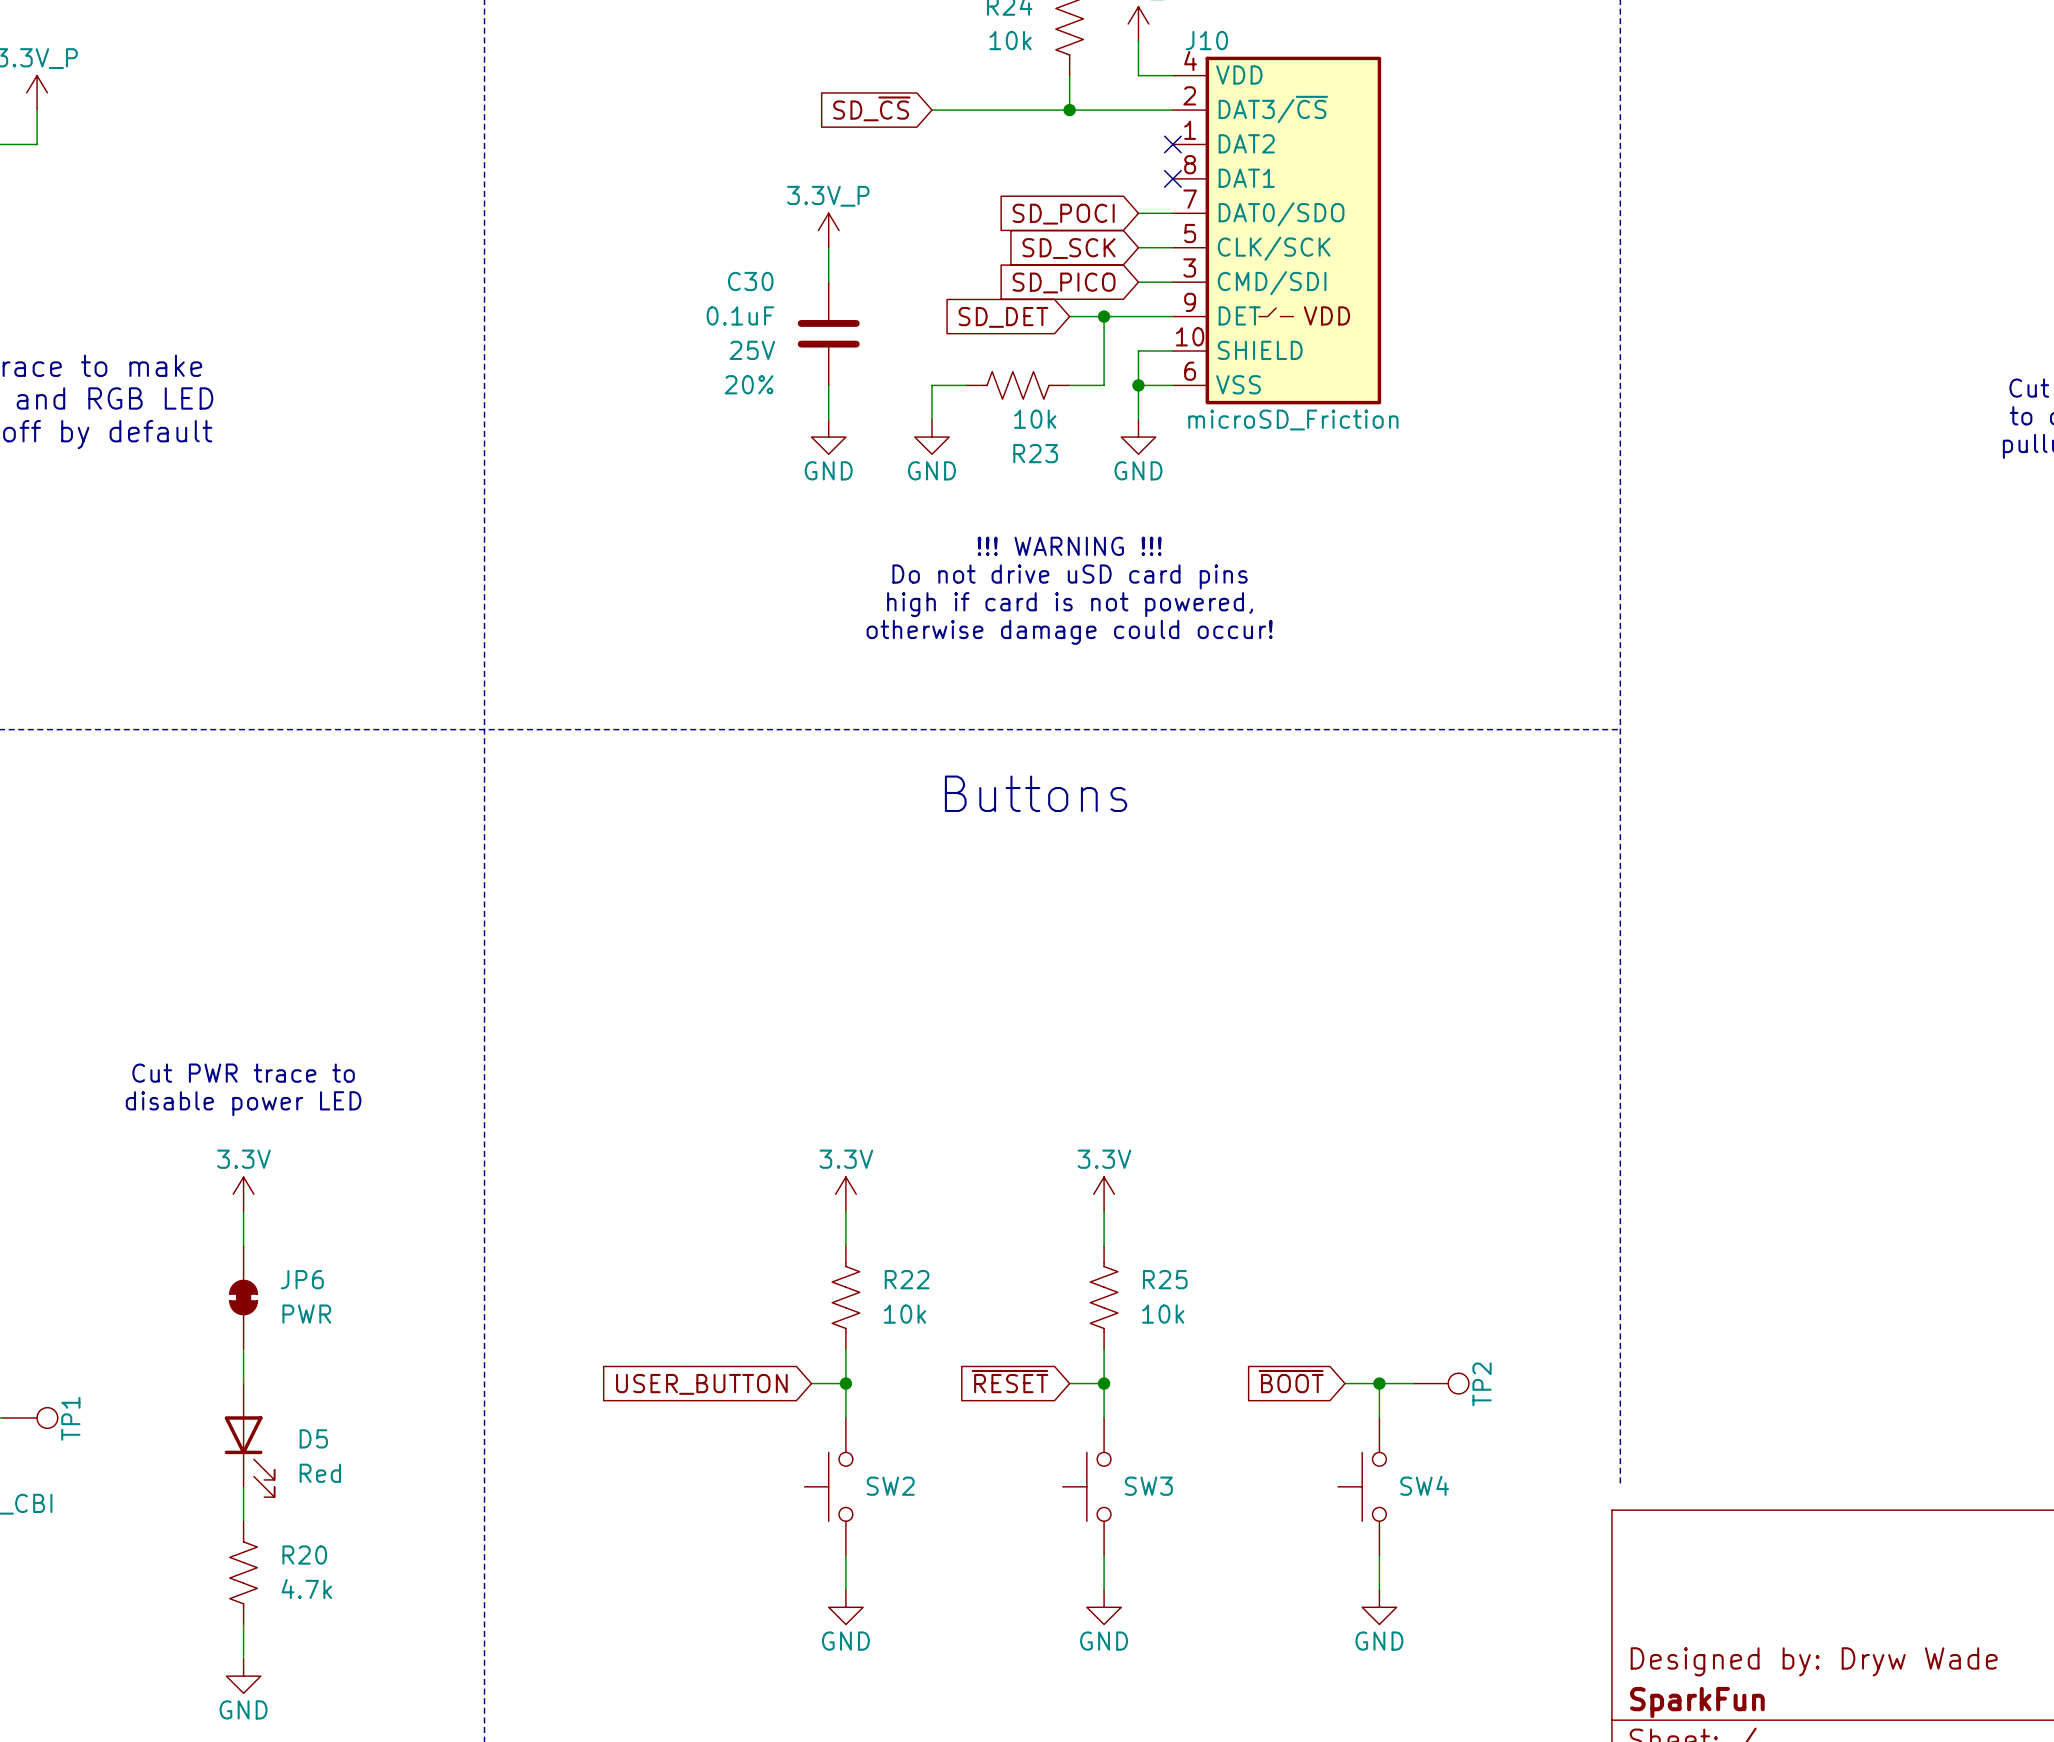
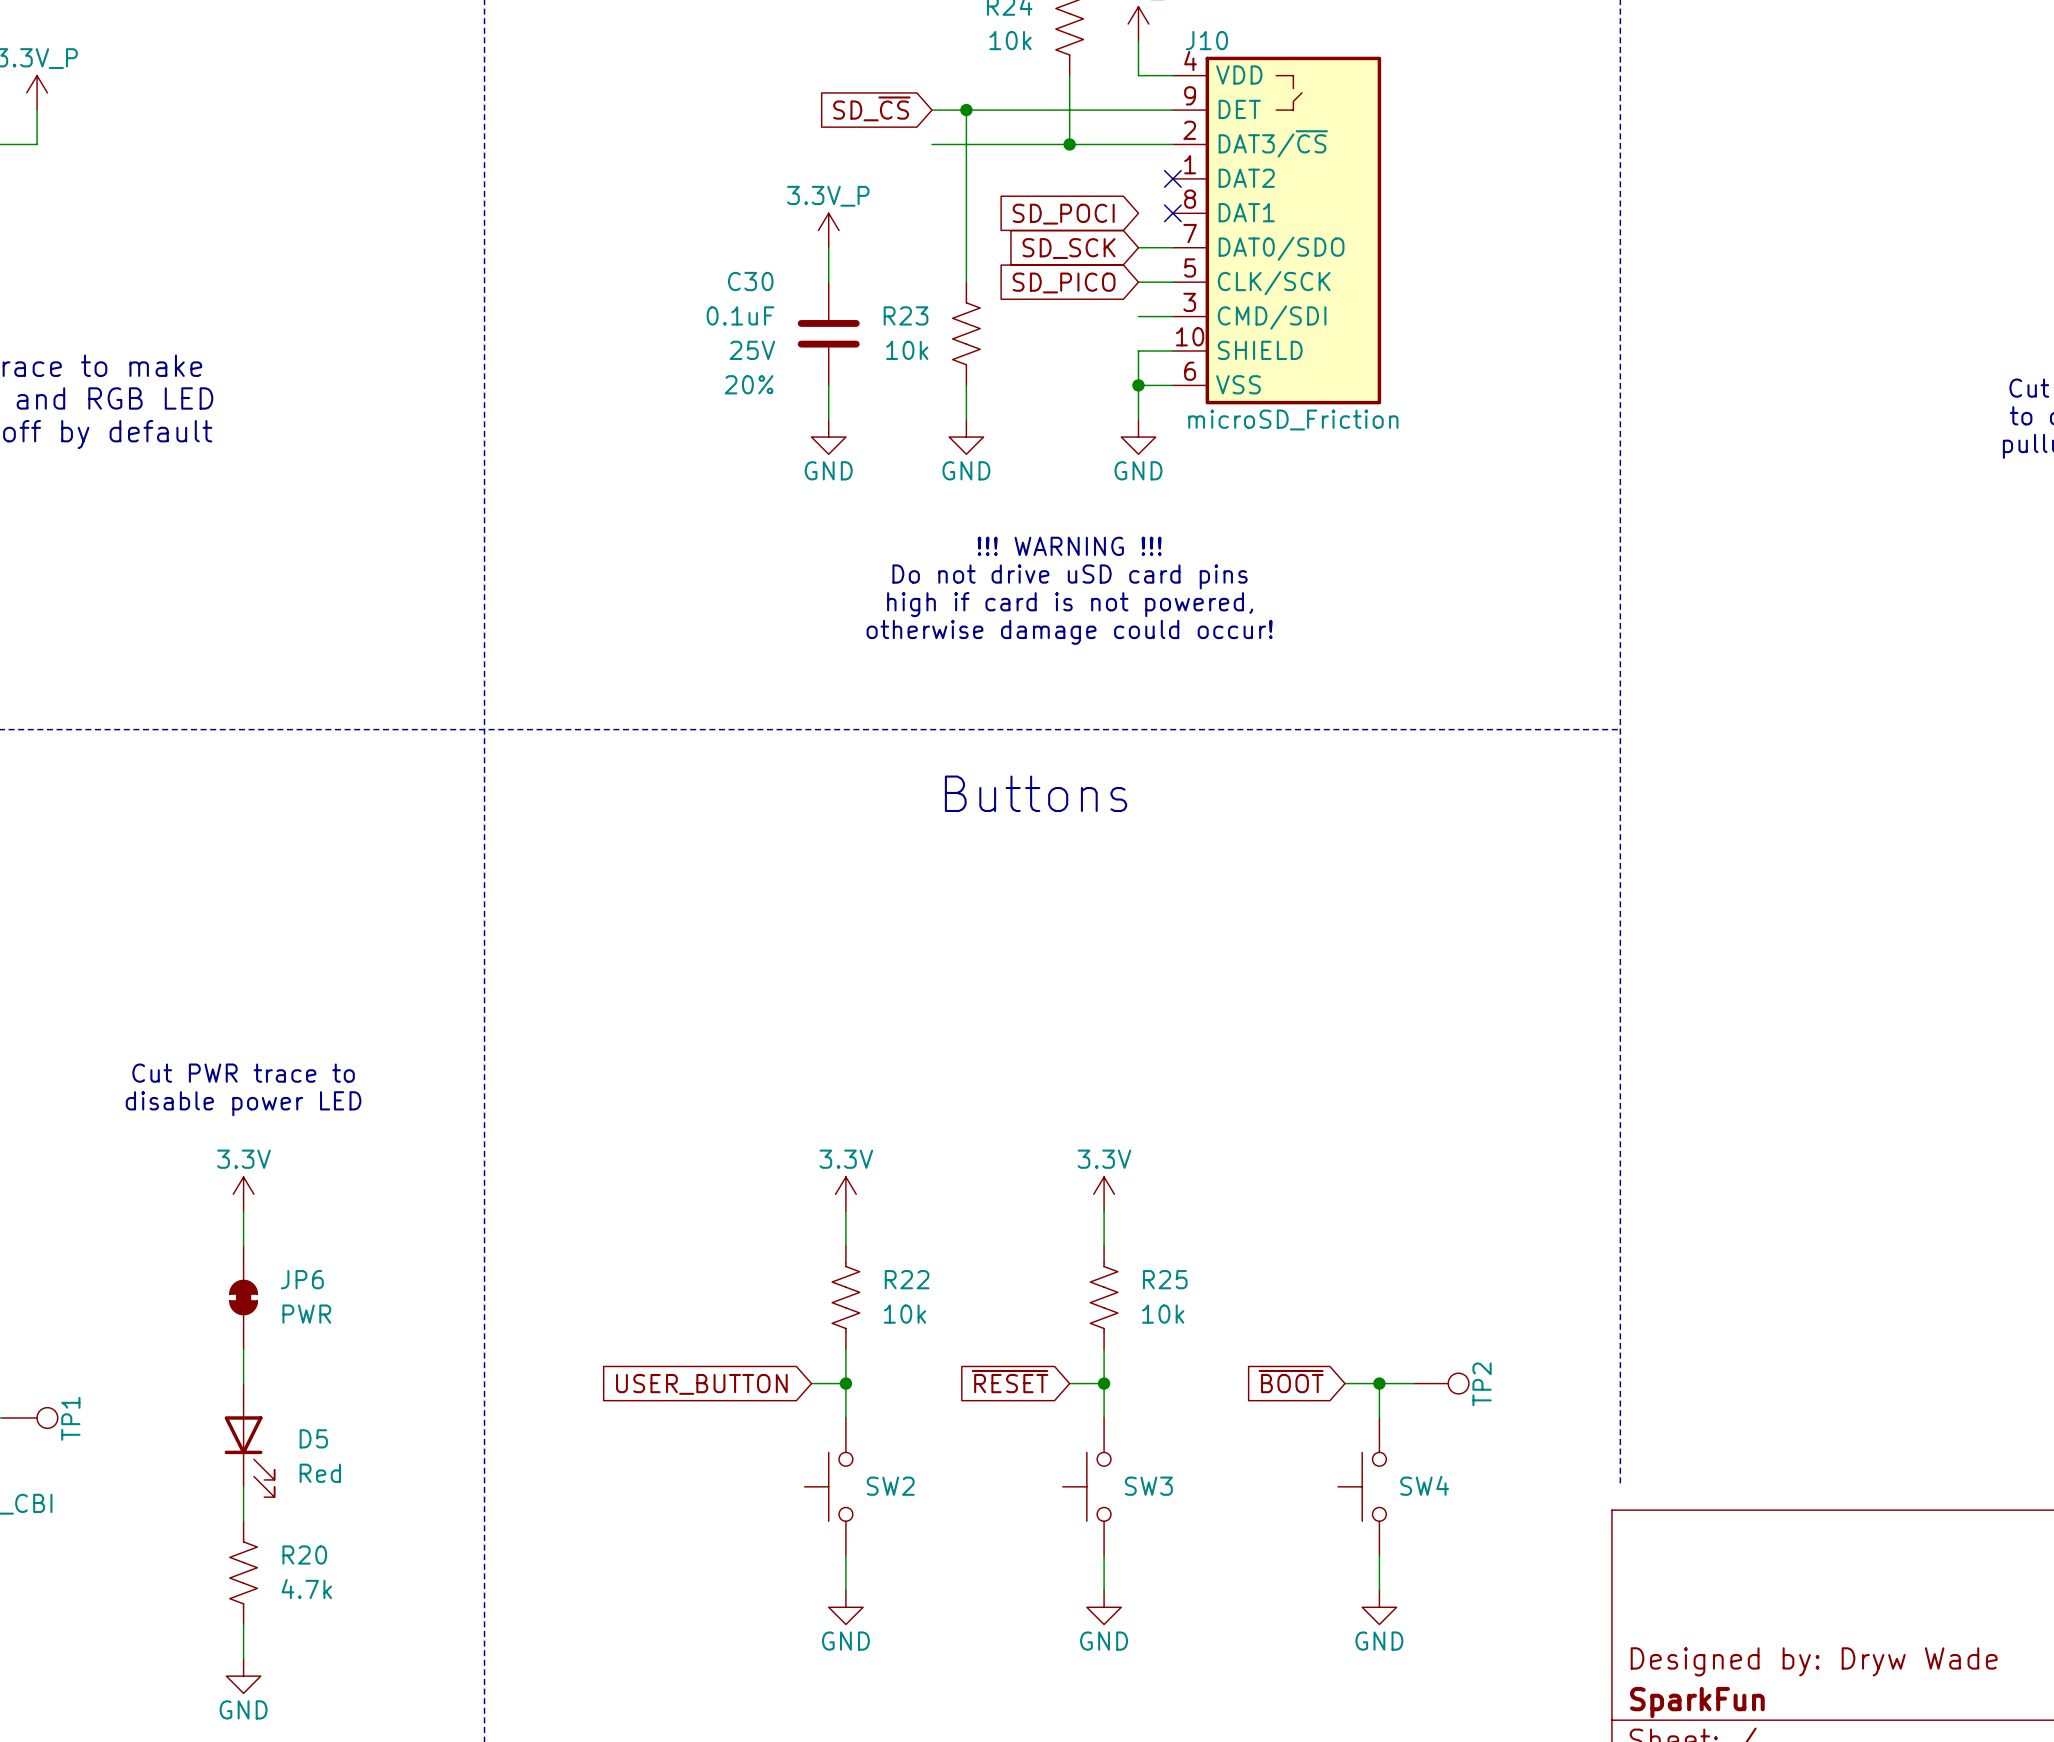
J10 symbol: [1172, 56, 1382, 405] -> [1172, 56, 1382, 405]
wire: none -> (966, 110) (966, 282)
junction: none -> (966, 110)
wire: none -> (1069, 110) (1069, 144)
junction position: (1069, 110) -> (1069, 144)
wire: none -> (931, 144) (1172, 144)
no-connect mark position: (1172, 144) -> (1172, 213)
wire: (1138, 213) (1172, 213) -> none
wire: (1069, 316) (1138, 316) -> none
wire: (1104, 316) (1104, 385) (1069, 385) -> none
junction: (1104, 316) -> none
global label: SD_DET (1003, 317) -> none
wire: (966, 385) (931, 385) (931, 419) -> (966, 385) (966, 419)
R23 rotation: 0° (1018, 385) -> 90° clockwise (966, 333)
R23 position: (1018, 385) -> (966, 333)
R23 value position: 10k (1035, 419) -> 10k (907, 350)
power symbol position: GND (931, 437) -> GND (966, 437)
R23 name position: R23 (1035, 453) -> R23 (906, 315)

